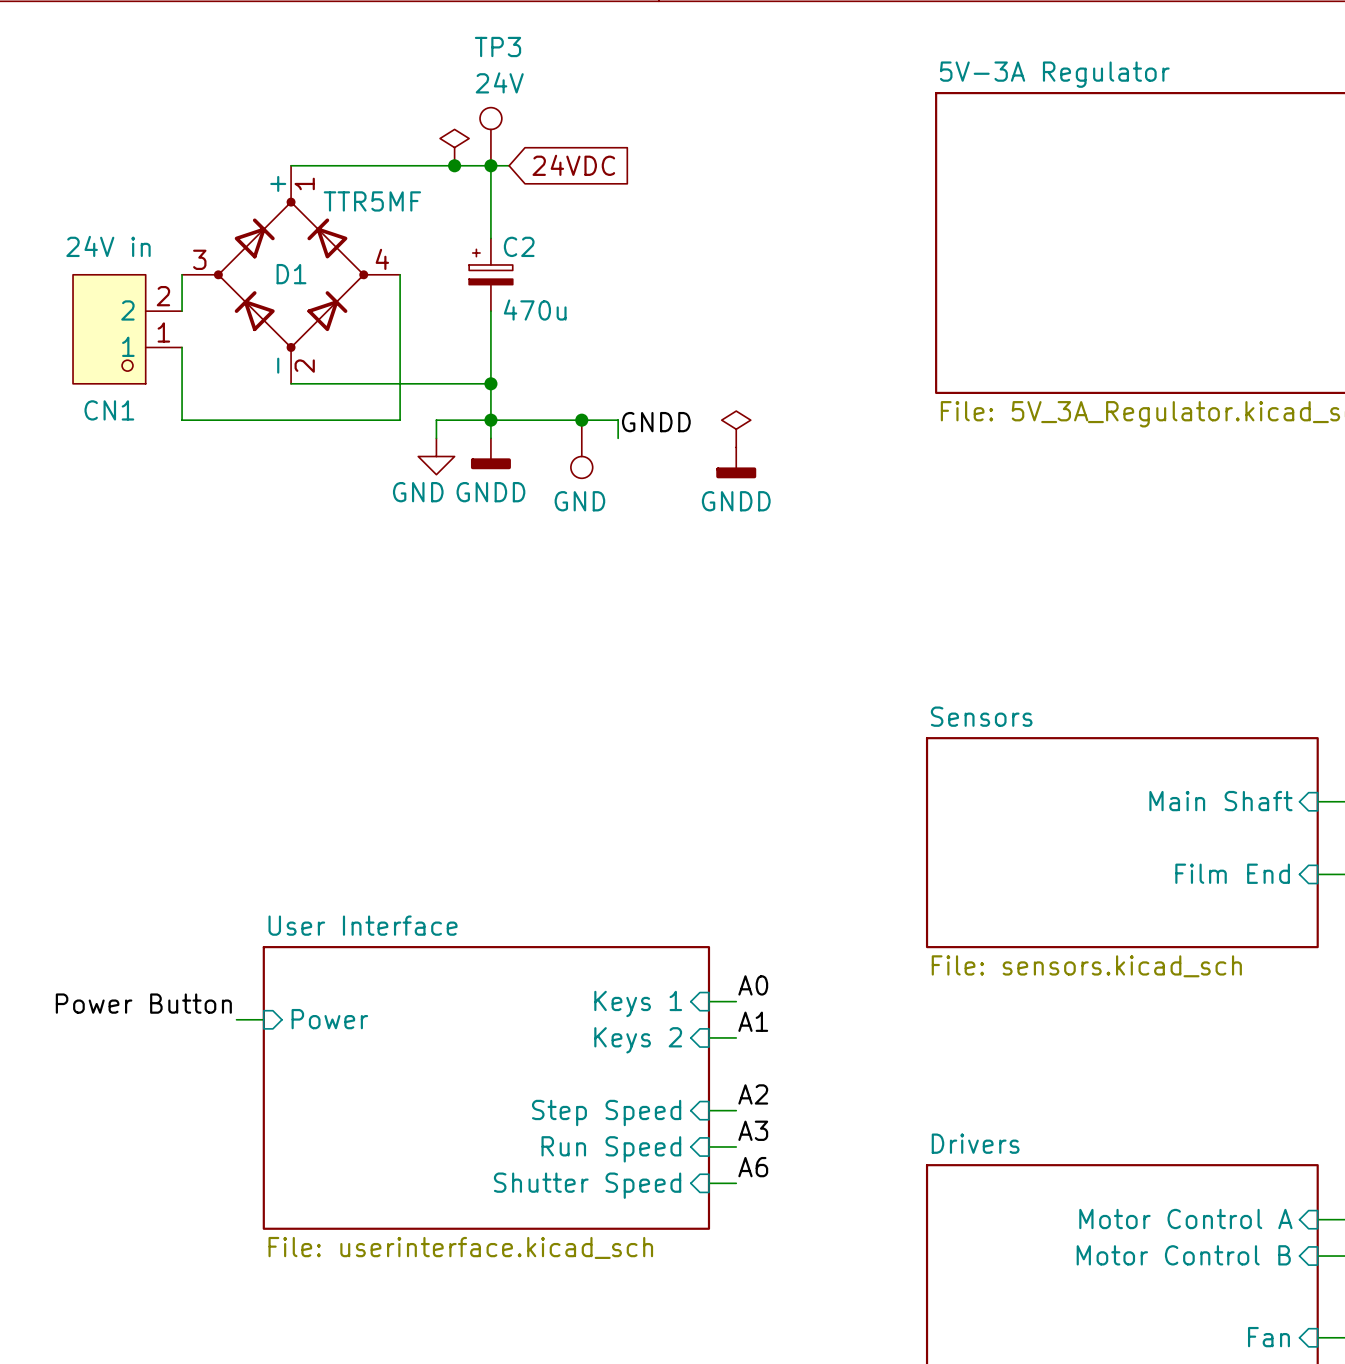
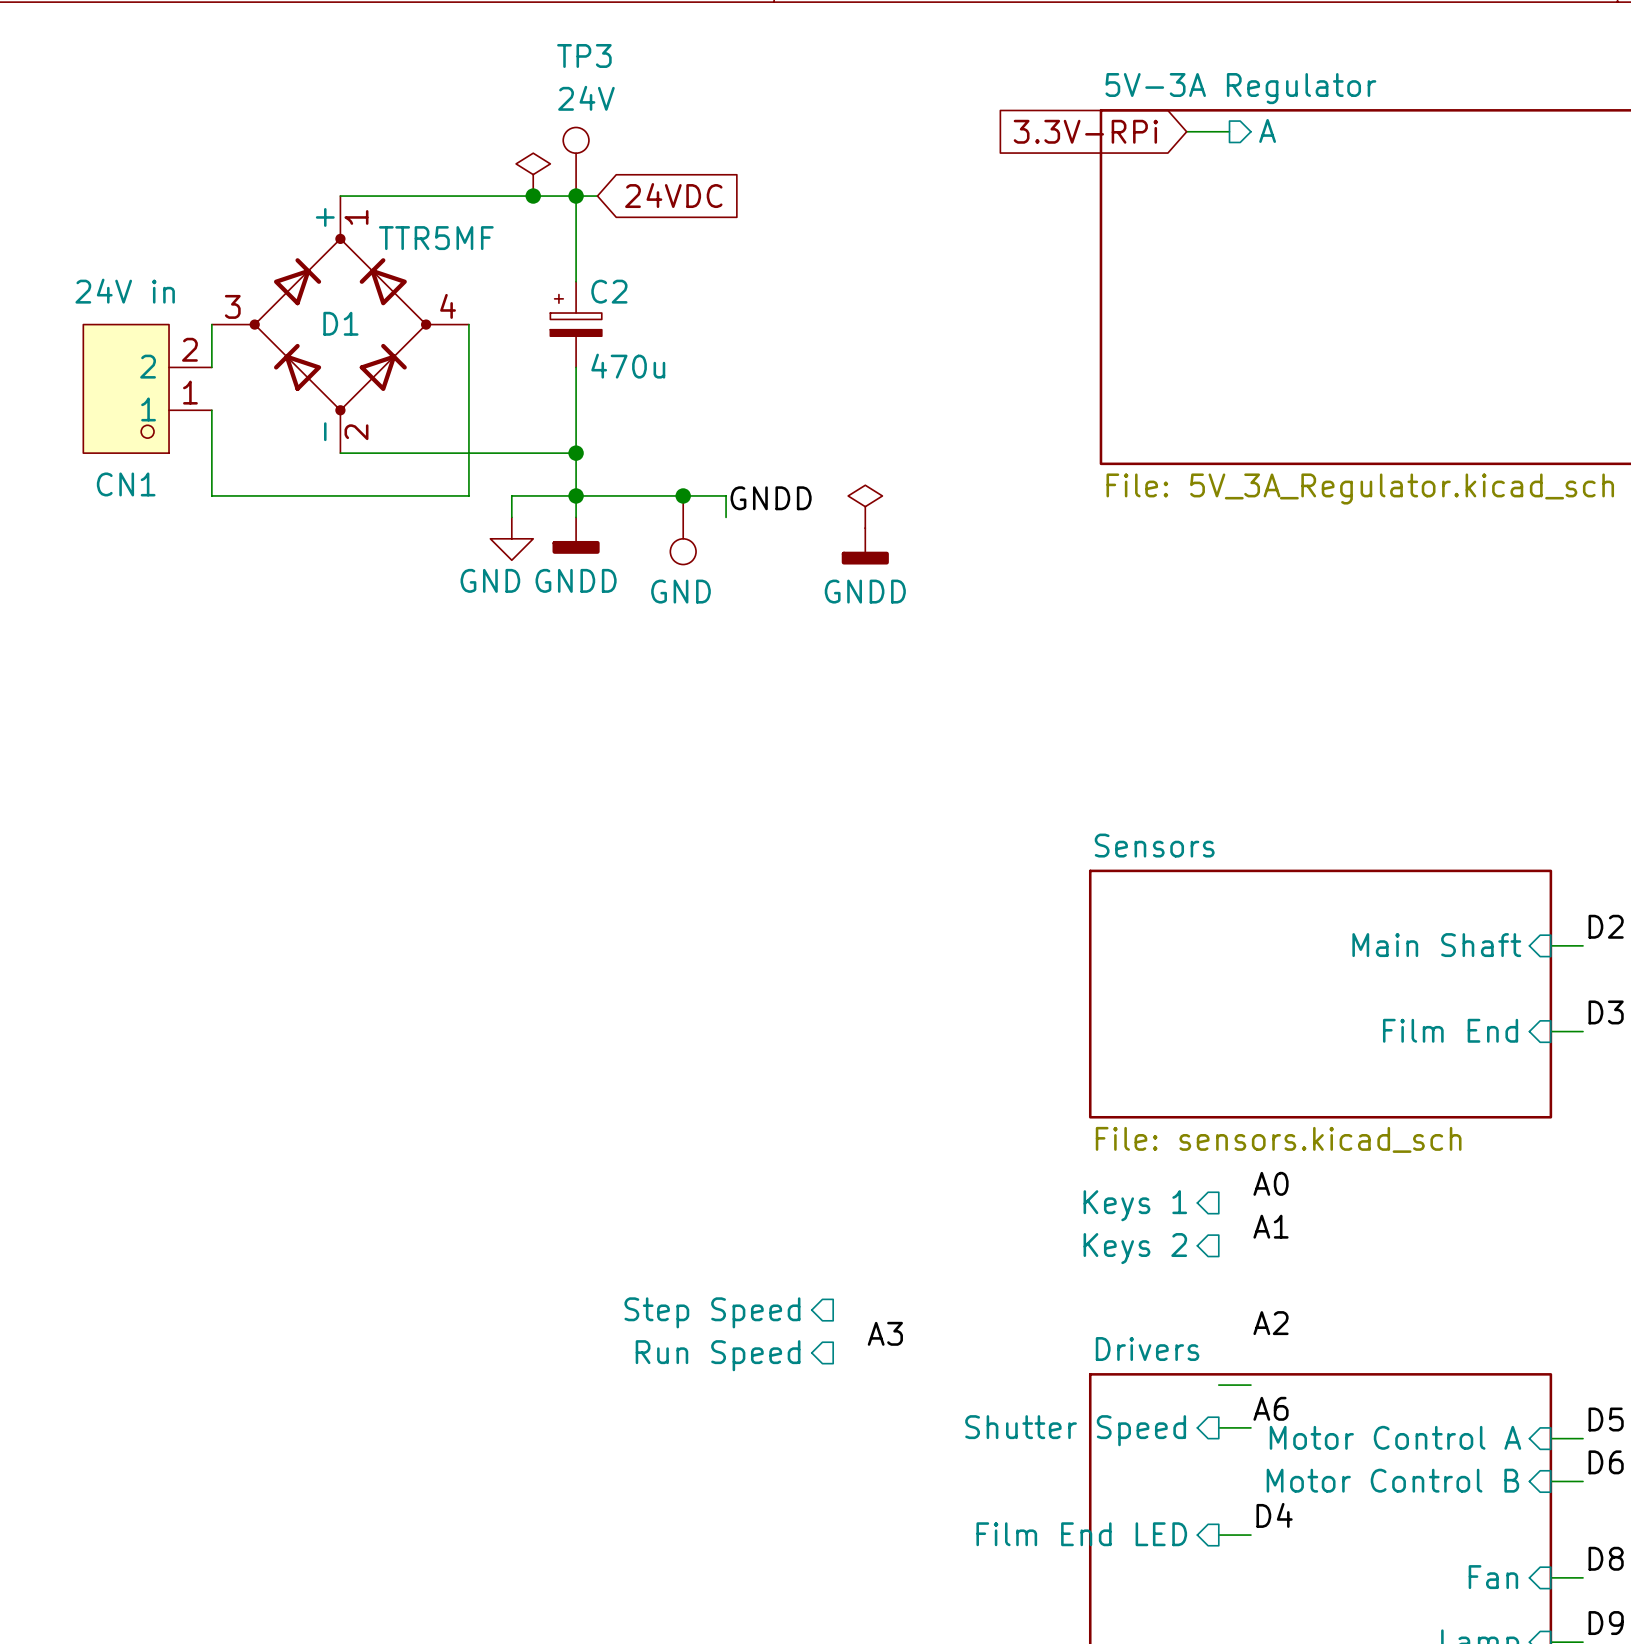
sheet pin: none -> A (1267, 130)
global label: none -> 3.3V-RPi (1085, 131)
wire: none -> (1186, 131) (1229, 131)
label position: A0 (753, 985) -> A0 (1270, 1183)
wire: (708, 1001) (736, 1001) -> none
label: Power Button (143, 1003) -> none
sheet pin position: Keys 1 (638, 1003) -> Keys 1 (1135, 1205)
wire: (236, 1019) (263, 1019) -> none
sheet pin: Power (329, 1019) -> none
label position: A1 (753, 1021) -> A1 (1270, 1226)
wire: (708, 1037) (736, 1037) -> none
sheet pin position: Keys 2 (638, 1040) -> Keys 2 (1135, 1248)
sheet User Interface: File: userinterface.kicad_sch (486, 1087) -> none
label position: A2 (753, 1094) -> A2 (1270, 1323)
wire: (708, 1110) (736, 1110) -> none
wire: (708, 1146) (736, 1146) -> (1218, 1385) (1250, 1385)
label position: A6 (753, 1167) -> A6 (1270, 1408)
wire: (708, 1183) (736, 1183) -> (1218, 1427) (1250, 1427)
sheet pin position: Shutter Speed (587, 1185) -> Shutter Speed (1075, 1430)
label: none -> D4 (1274, 1515)
sheet pin: none -> Film End LED (1081, 1534)
wire: none -> (1218, 1535) (1250, 1535)

